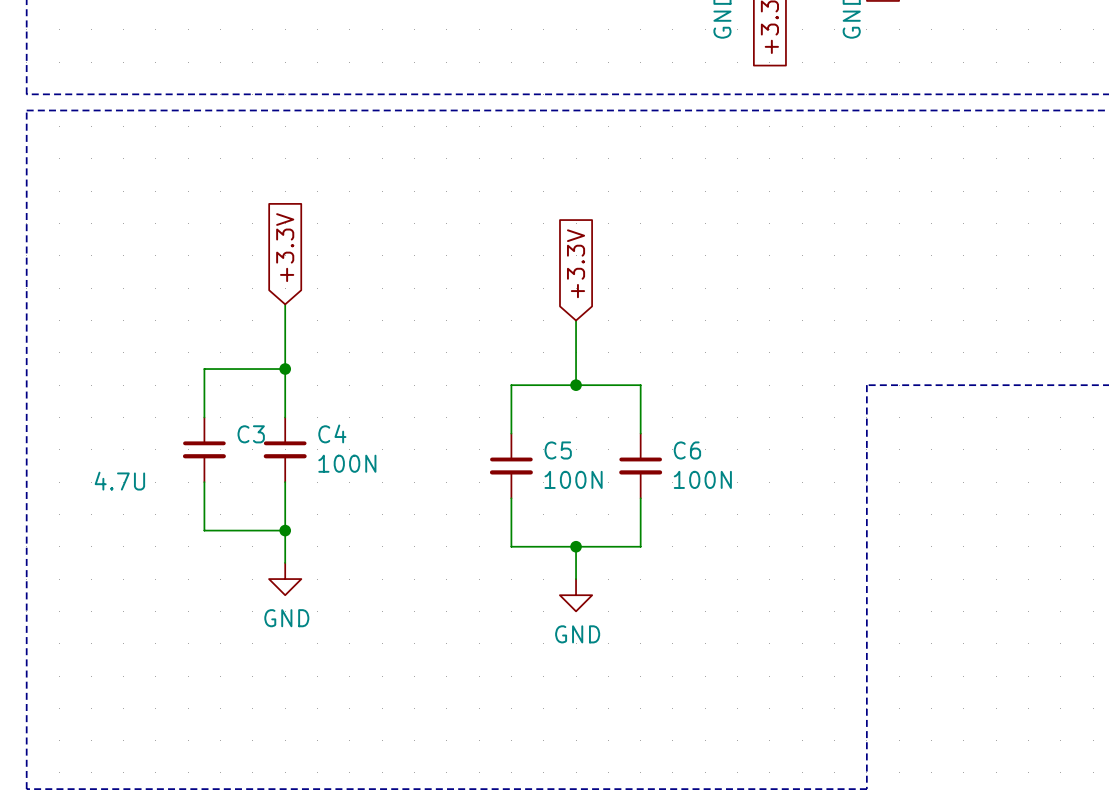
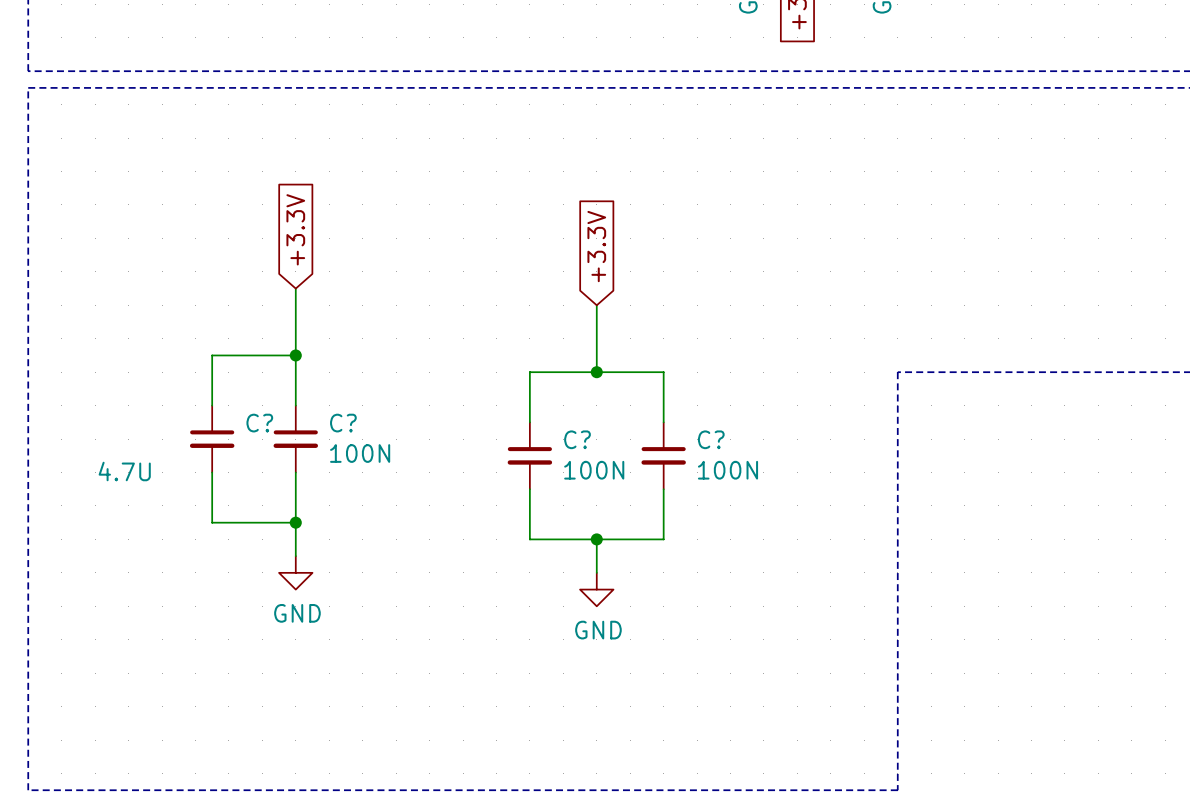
C4 name: C4 (332, 433) -> C? (343, 423)
C3 name: C3 (251, 434) -> C? (259, 423)
C5 name: C5 (558, 450) -> C? (577, 439)
C6 name: C6 (687, 450) -> C? (711, 439)

